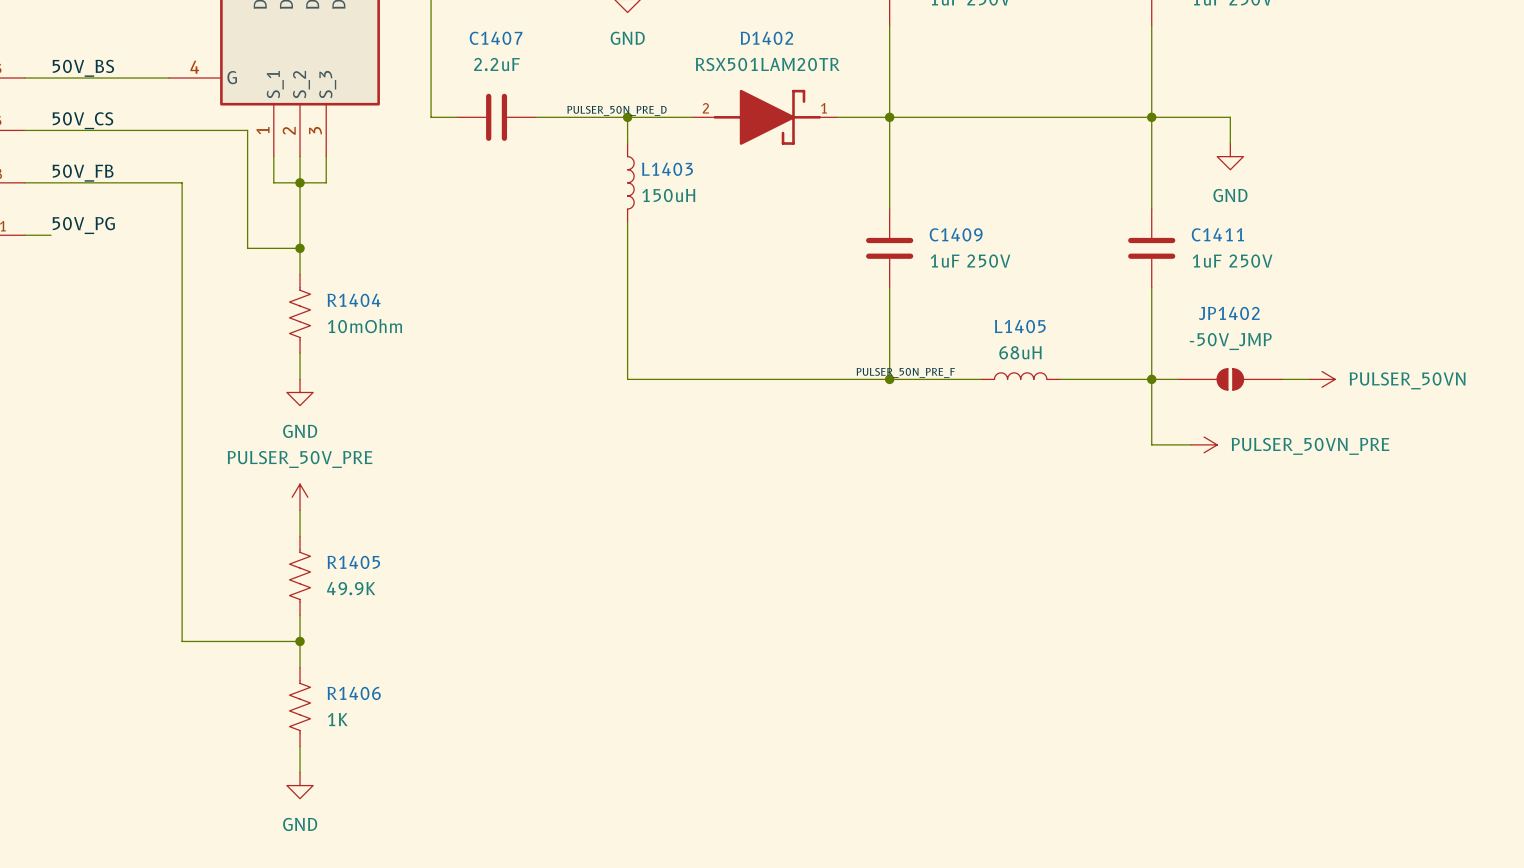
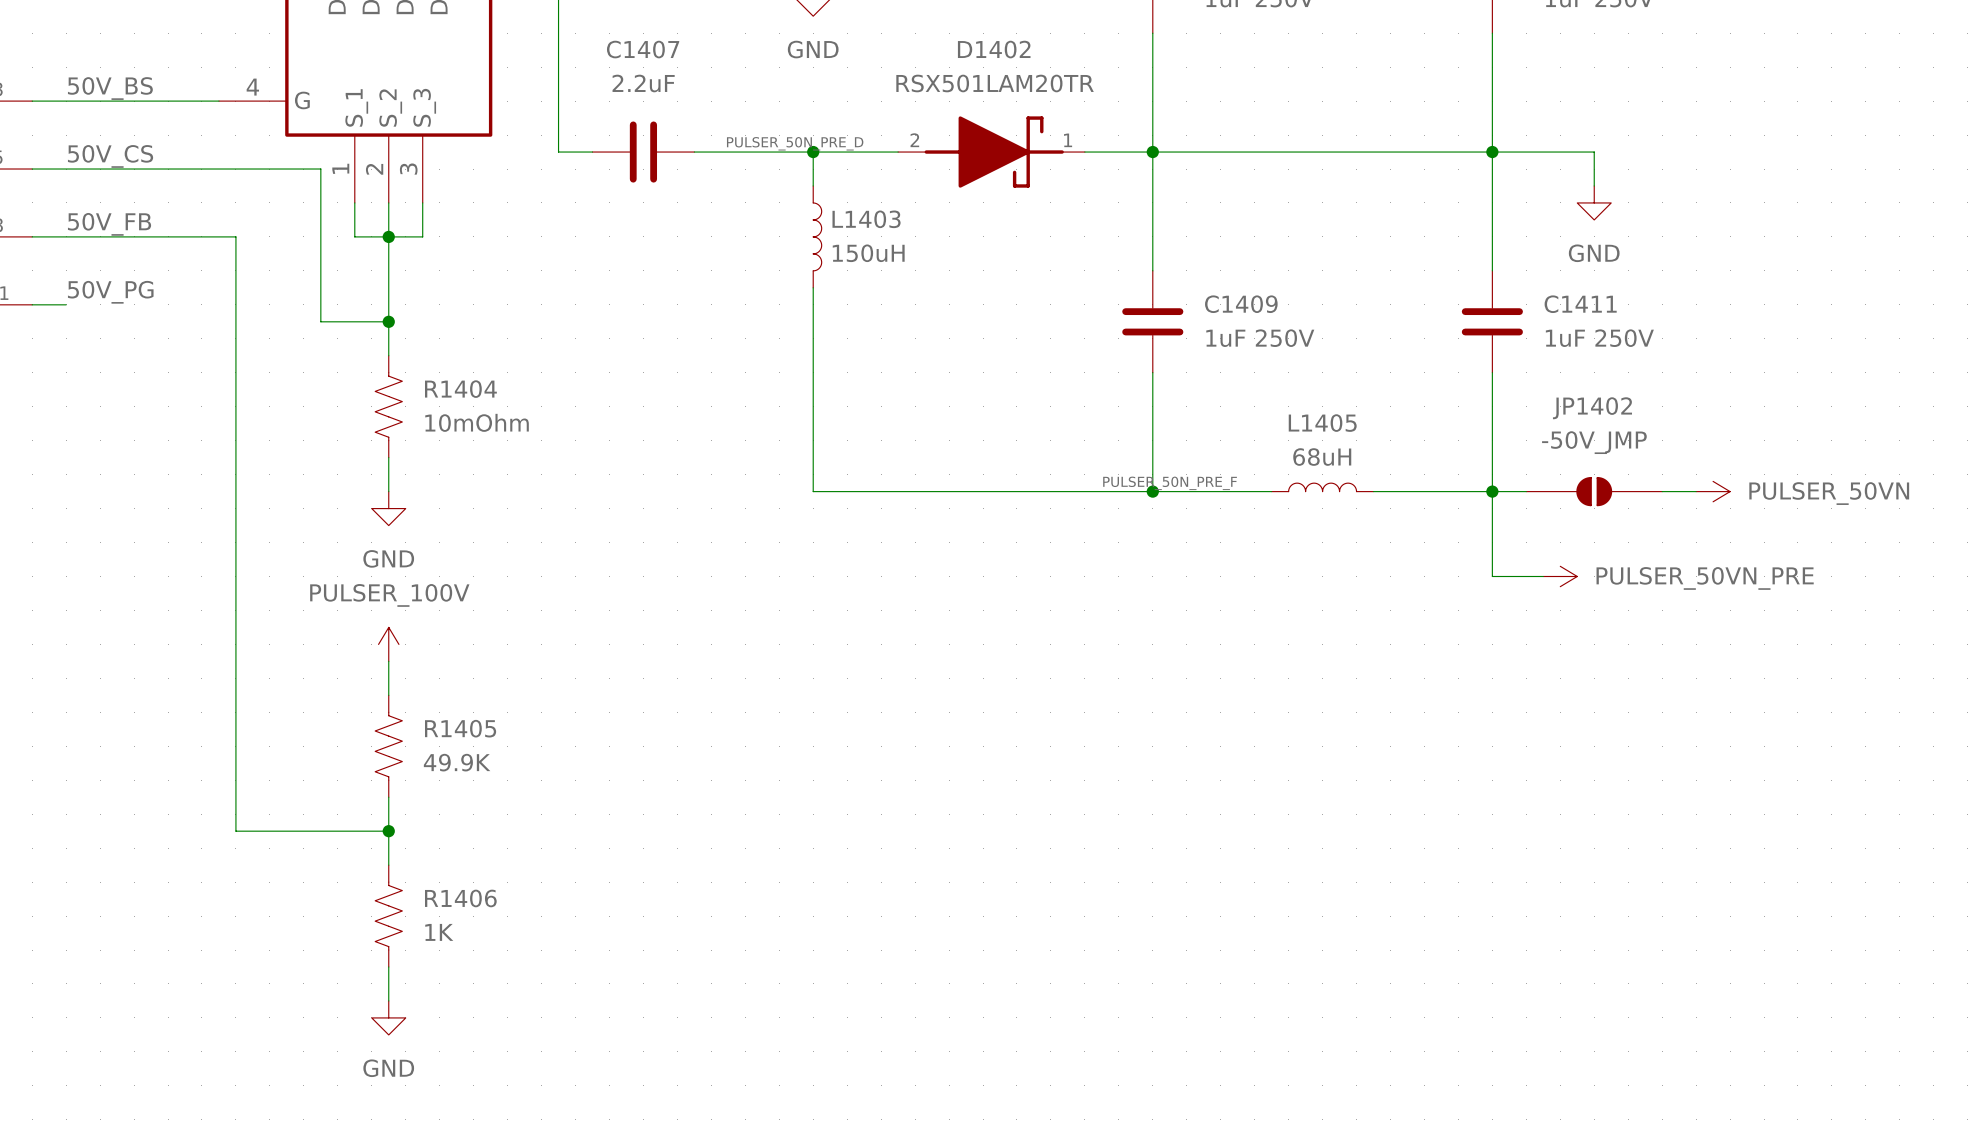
power symbol: PULSER_50V_PRE (300, 497) -> PULSER_100V (388, 644)

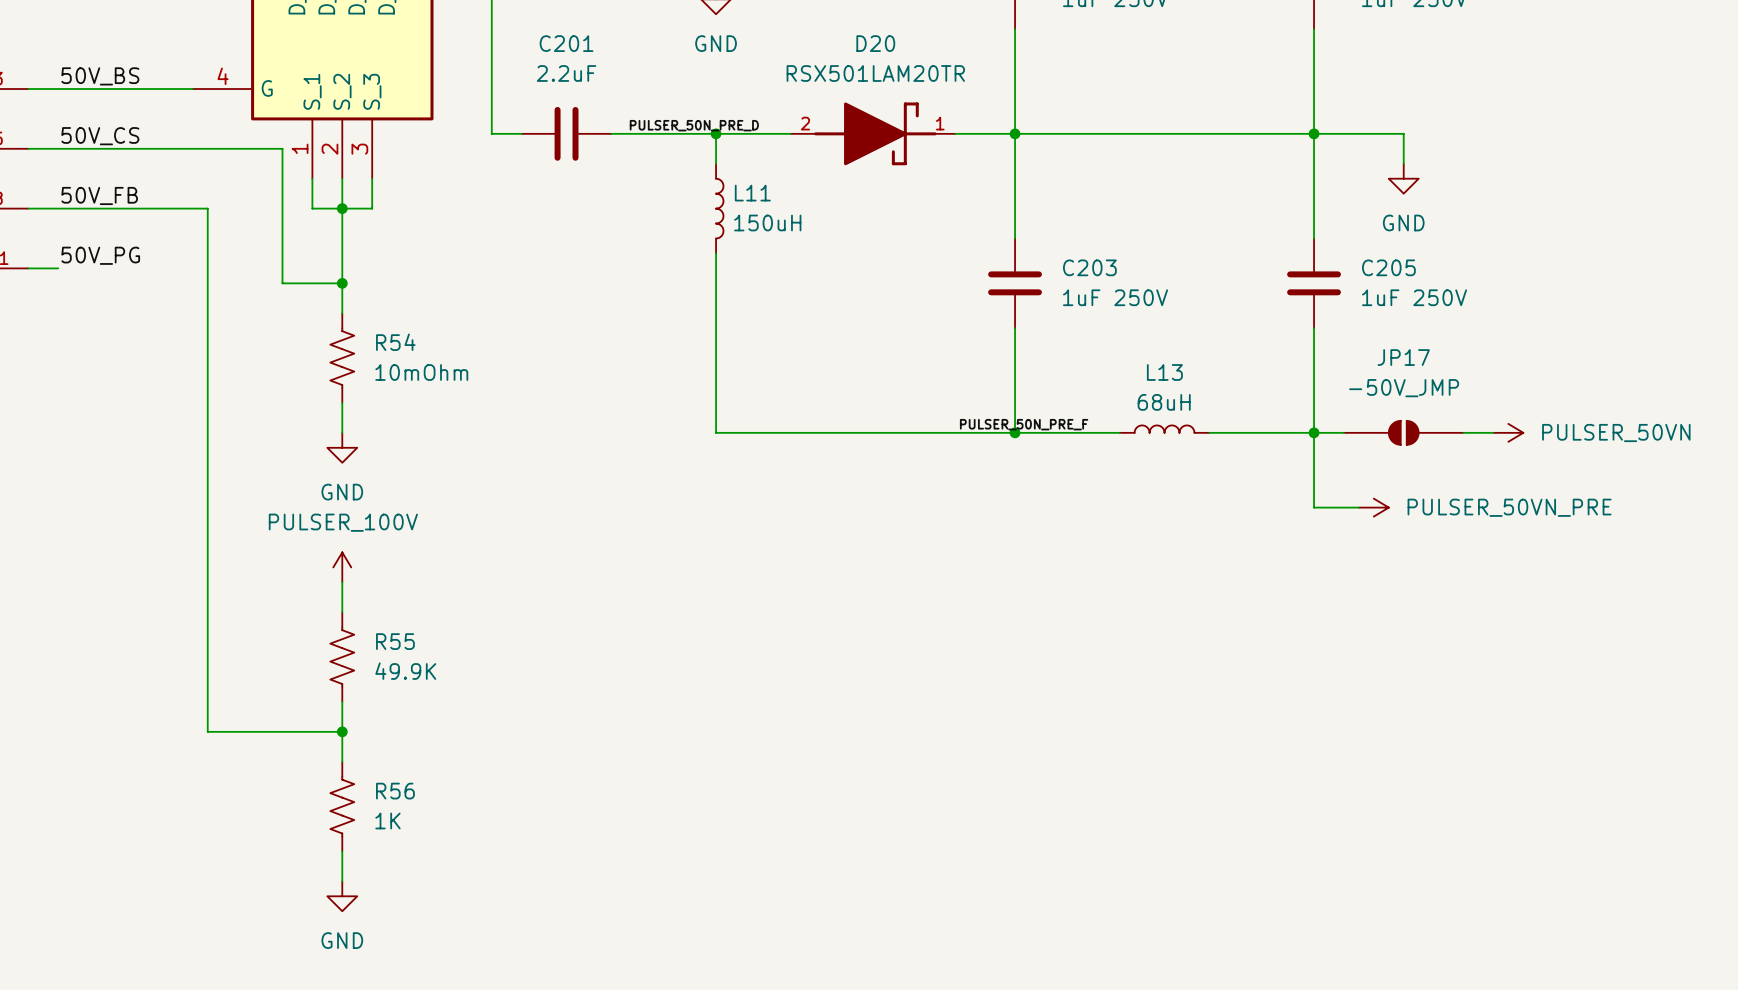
C1407 name: C1407 (643, 49) -> C201 (566, 43)
D1402 name: D1402 (994, 49) -> D20 (875, 43)
L1403 name: L1403 (866, 219) -> L11 (752, 193)
C1409 name: C1409 (1241, 304) -> C203 (1089, 267)
C1411 name: C1411 (1580, 304) -> C205 (1388, 267)
R1404 name: R1404 (460, 389) -> R54 (395, 342)
JP1402 name: JP1402 (1592, 408) -> JP17 (1403, 357)
L1405 name: L1405 (1322, 423) -> L13 (1164, 372)
R1405 name: R1405 (460, 728) -> R55 (395, 641)
R1406 name: R1406 (460, 898) -> R56 (395, 791)

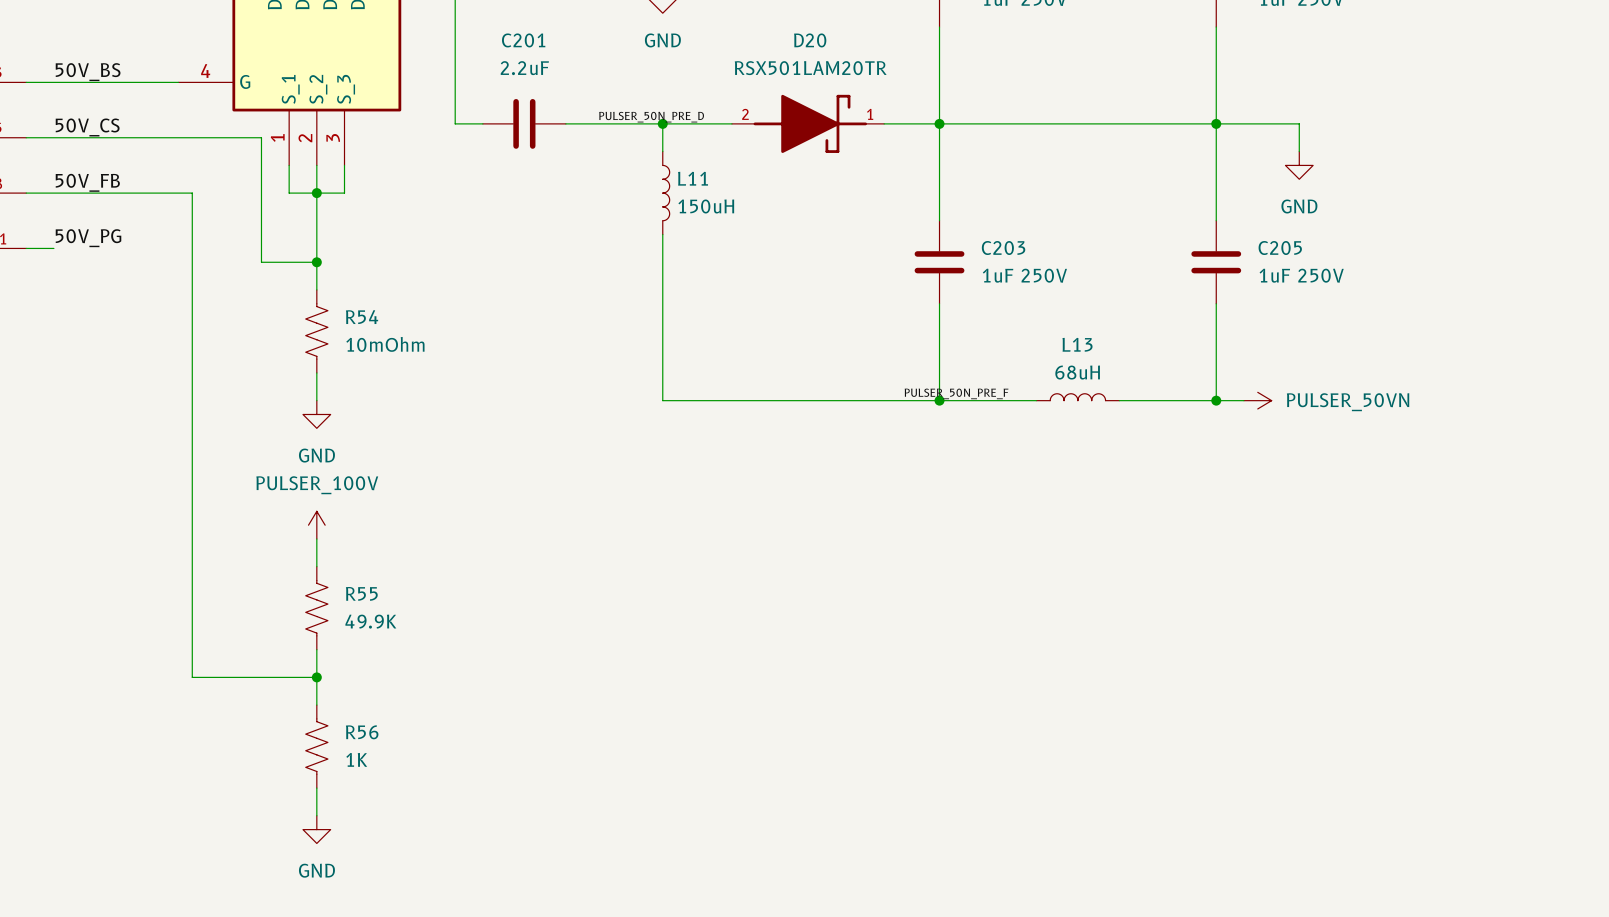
wire: (1314, 432) (1314, 507) (1358, 507) -> none
JP17: -50V_JMP (1403, 432) -> none
wire: (1463, 432) (1493, 432) -> none
power symbol position: PULSER_50VN (1508, 432) -> PULSER_50VN (1257, 400)
power symbol: PULSER_50VN_PRE (1373, 507) -> none

